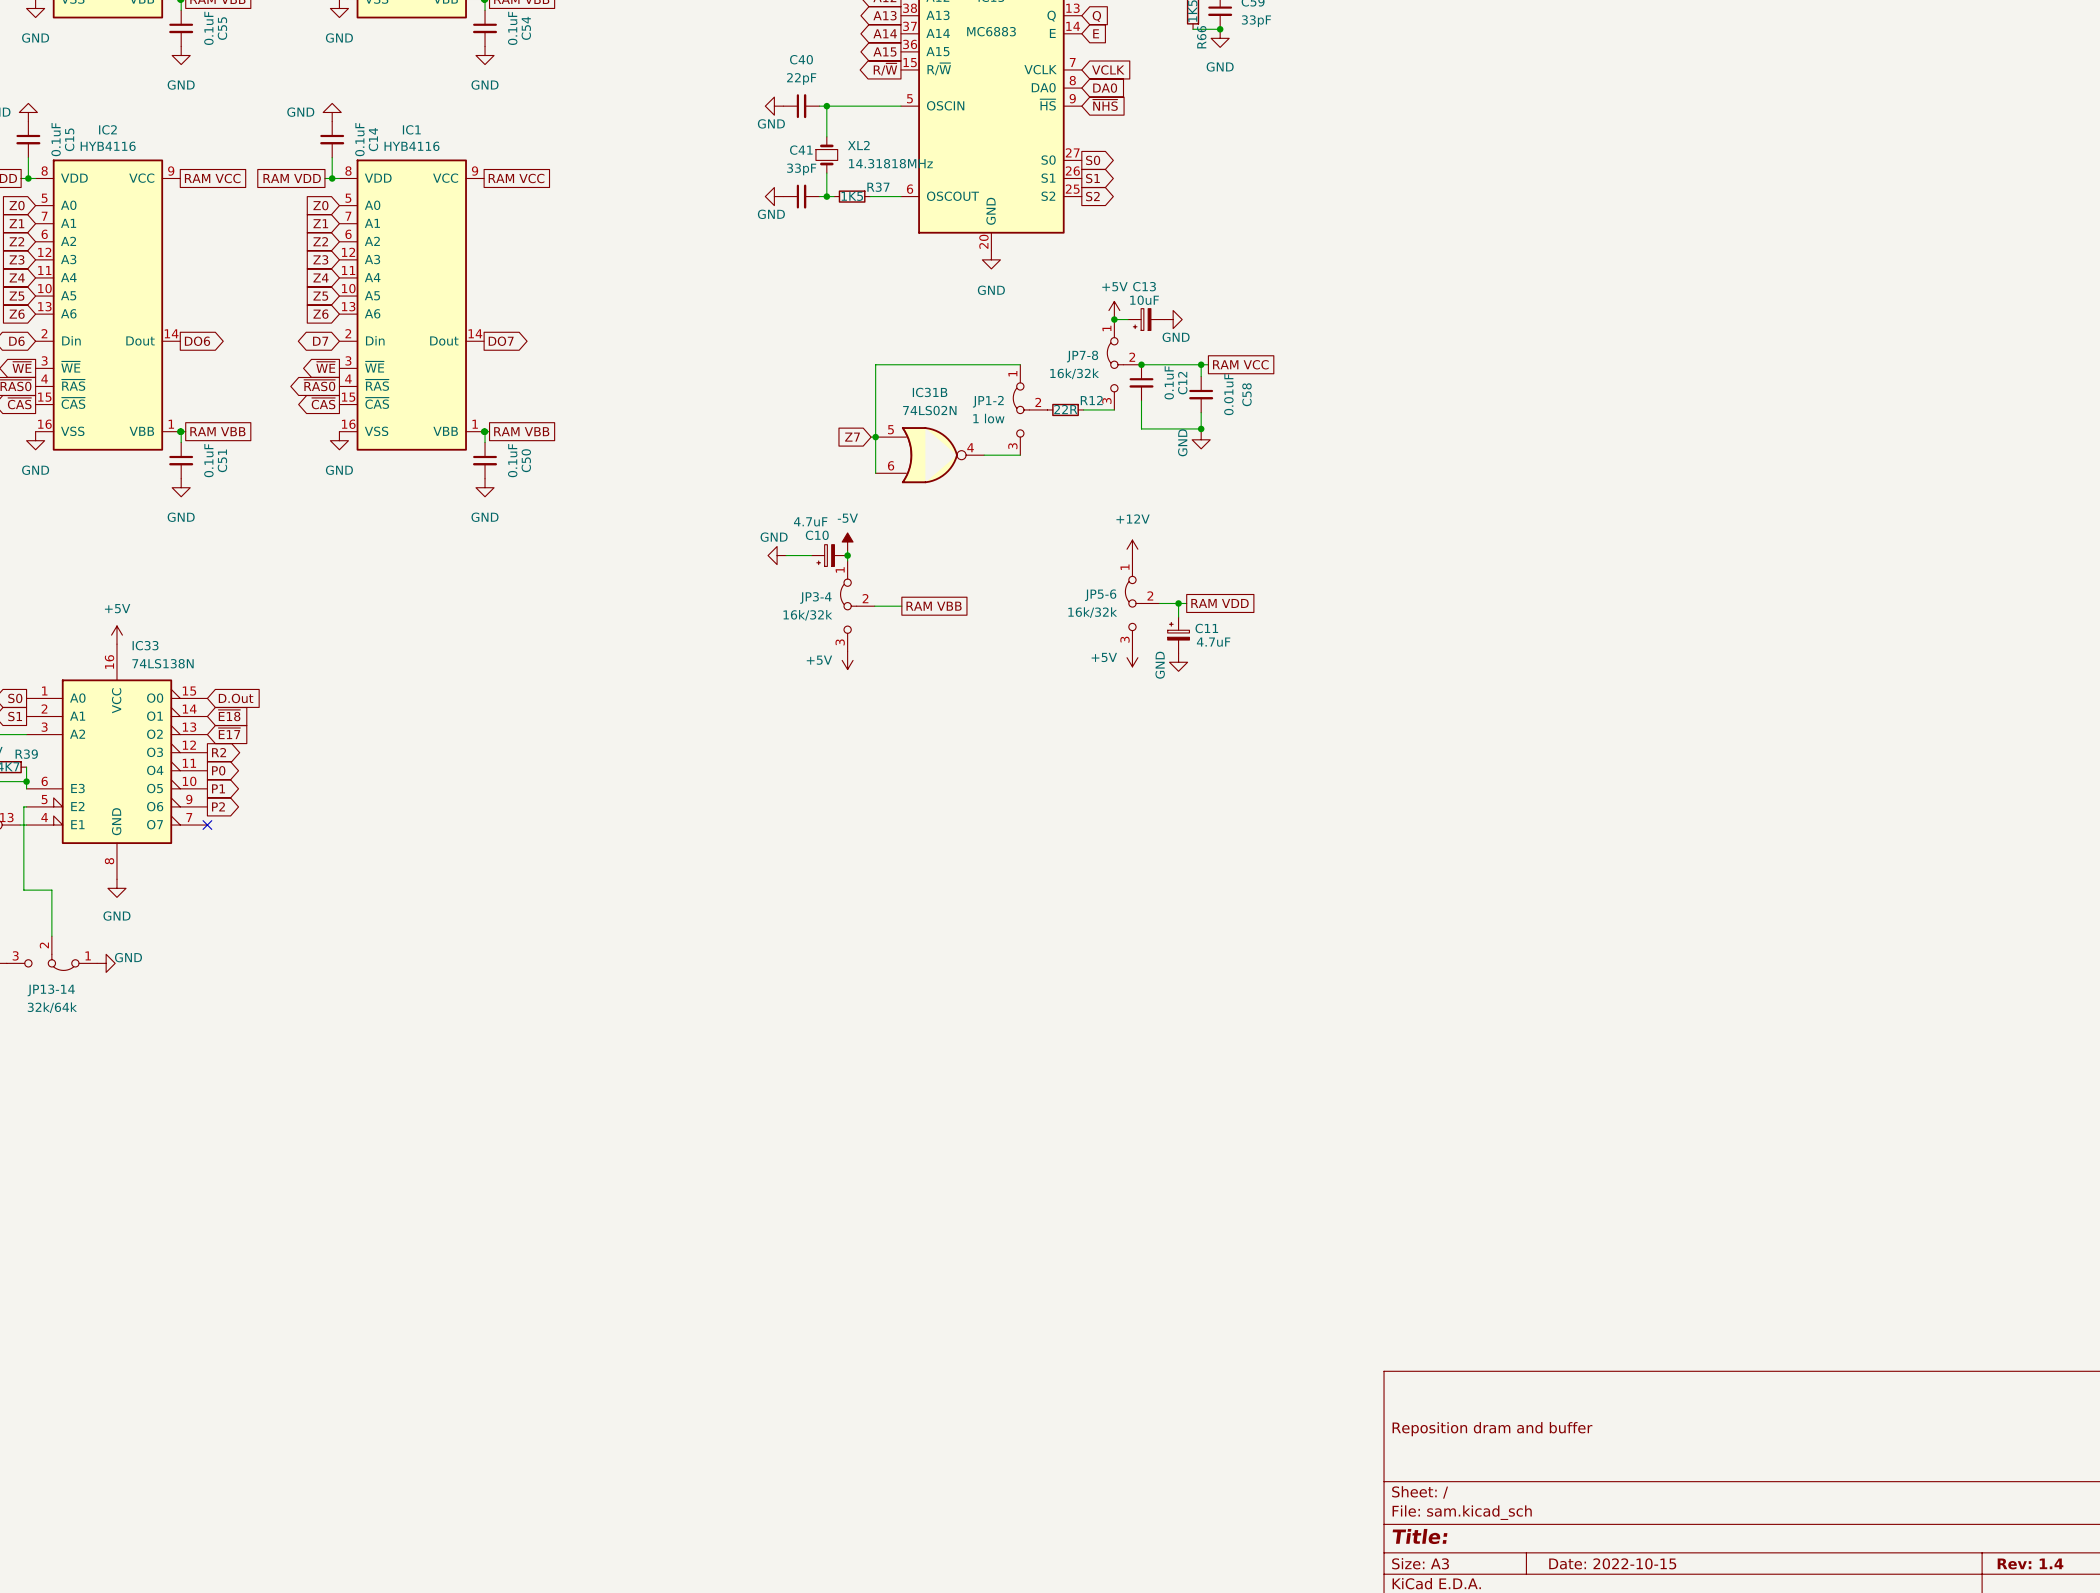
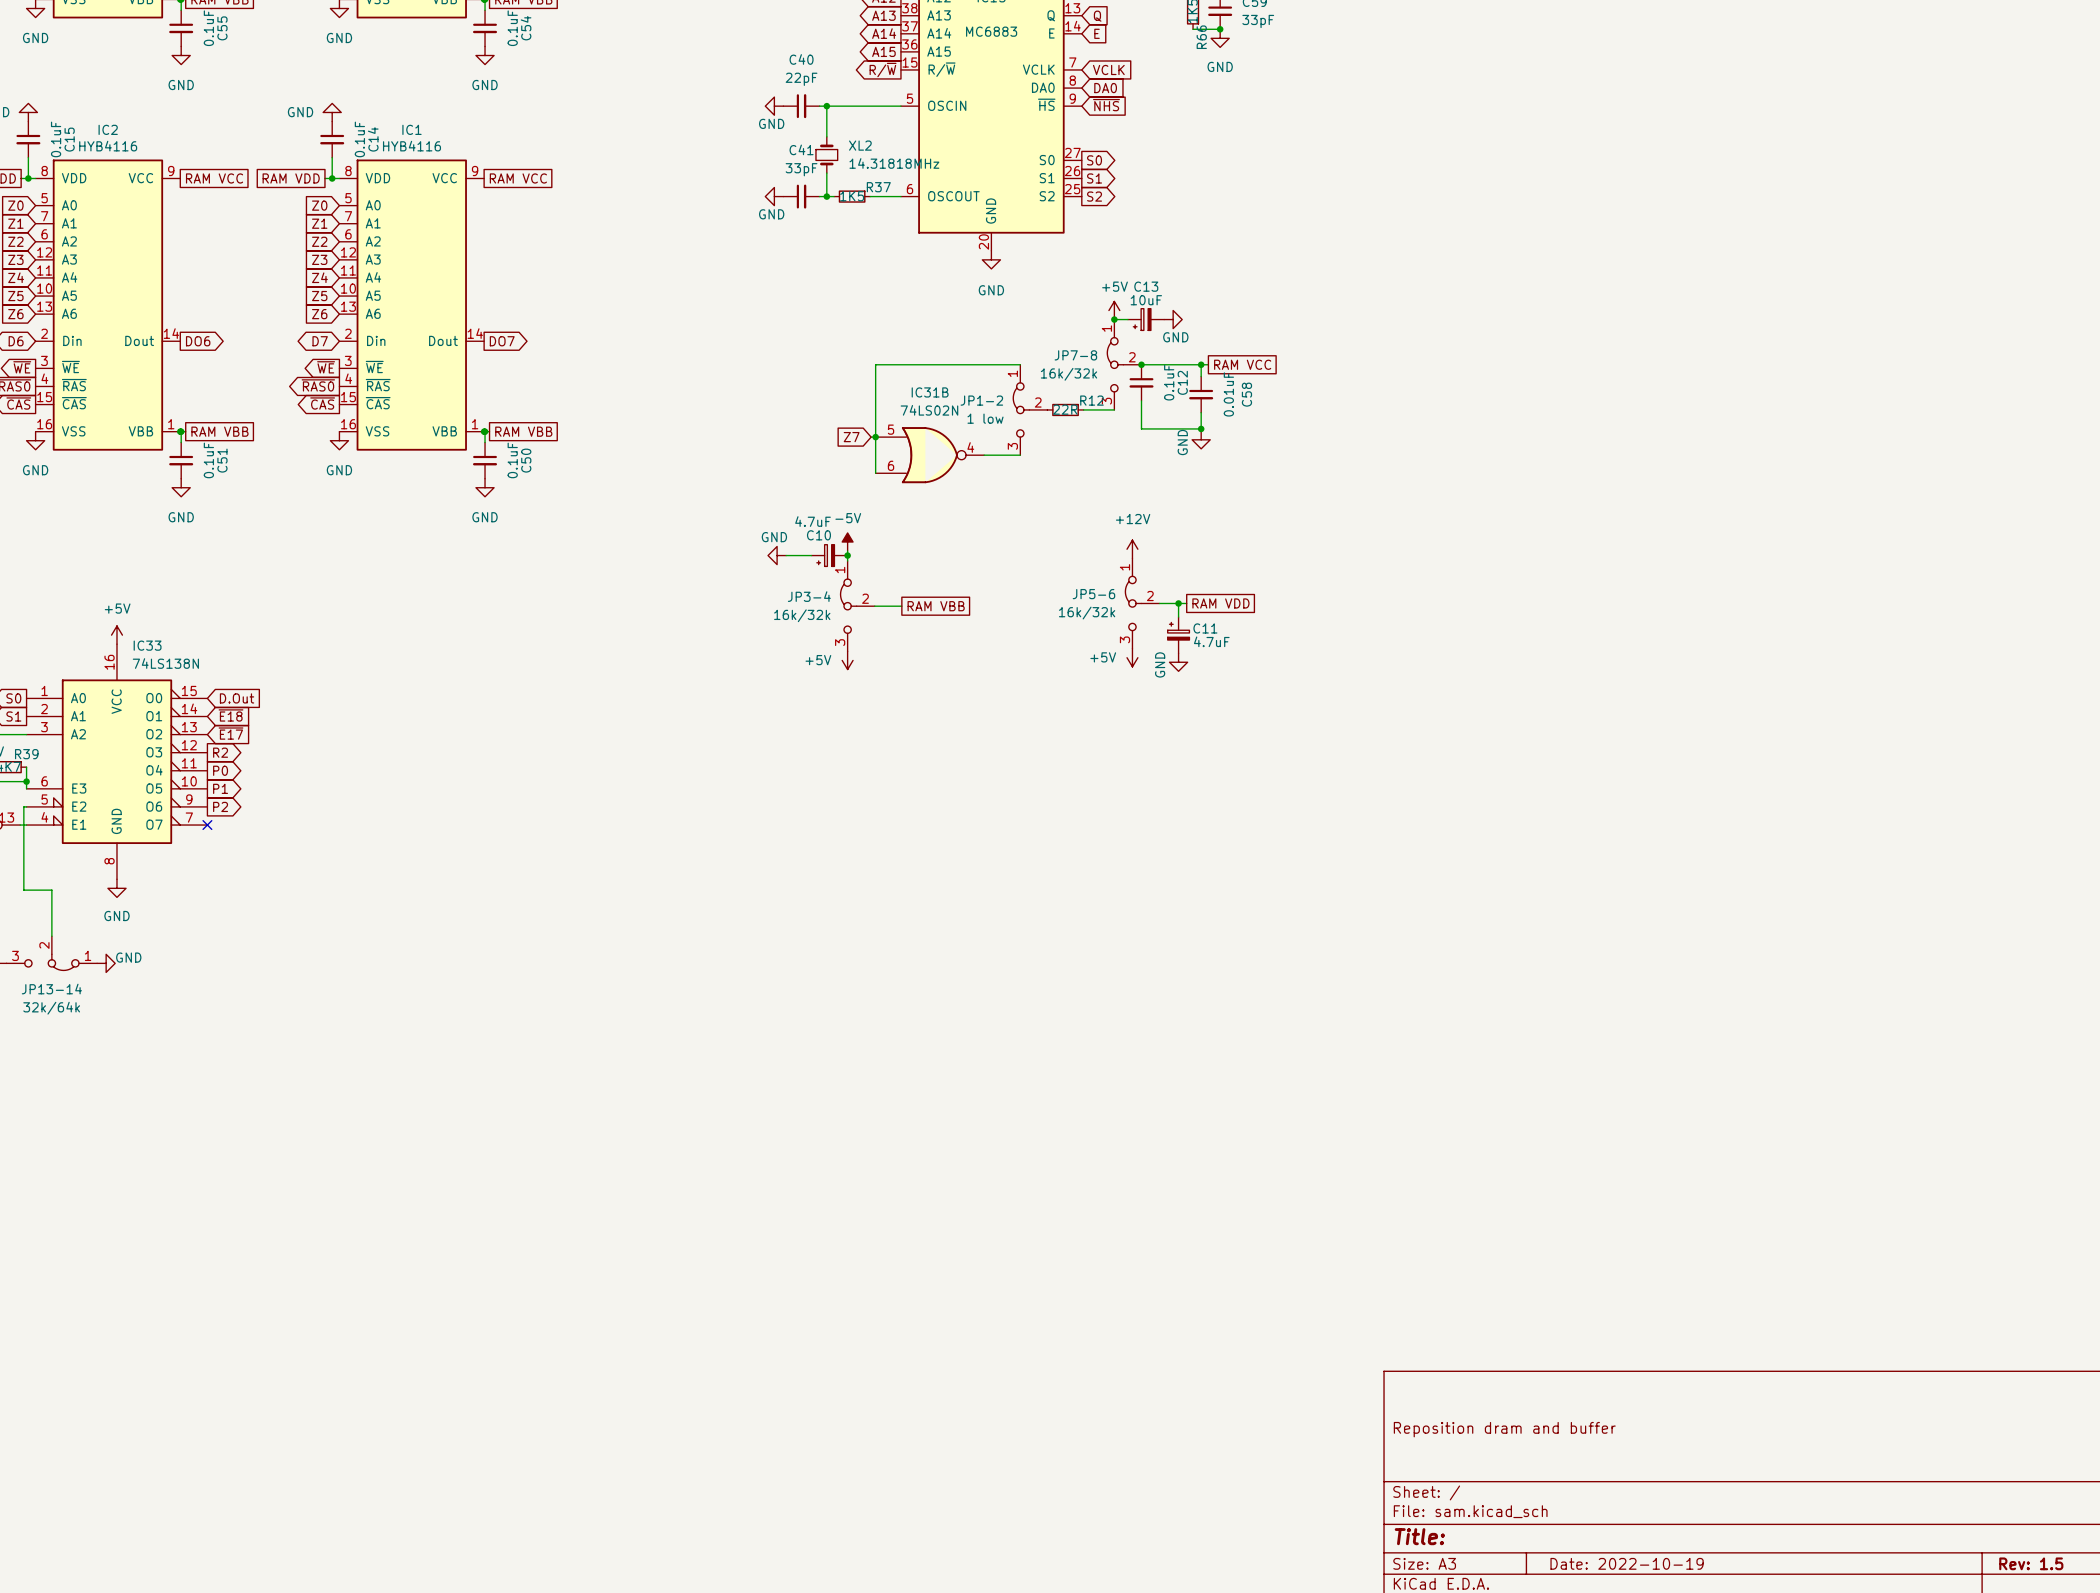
title block: Date: 2022-10-15 (1612, 1563) -> Date: 2022-10-19 (1627, 1563)
title block: Rev: 1.4 (2030, 1563) -> Rev: 1.5 (2031, 1563)

